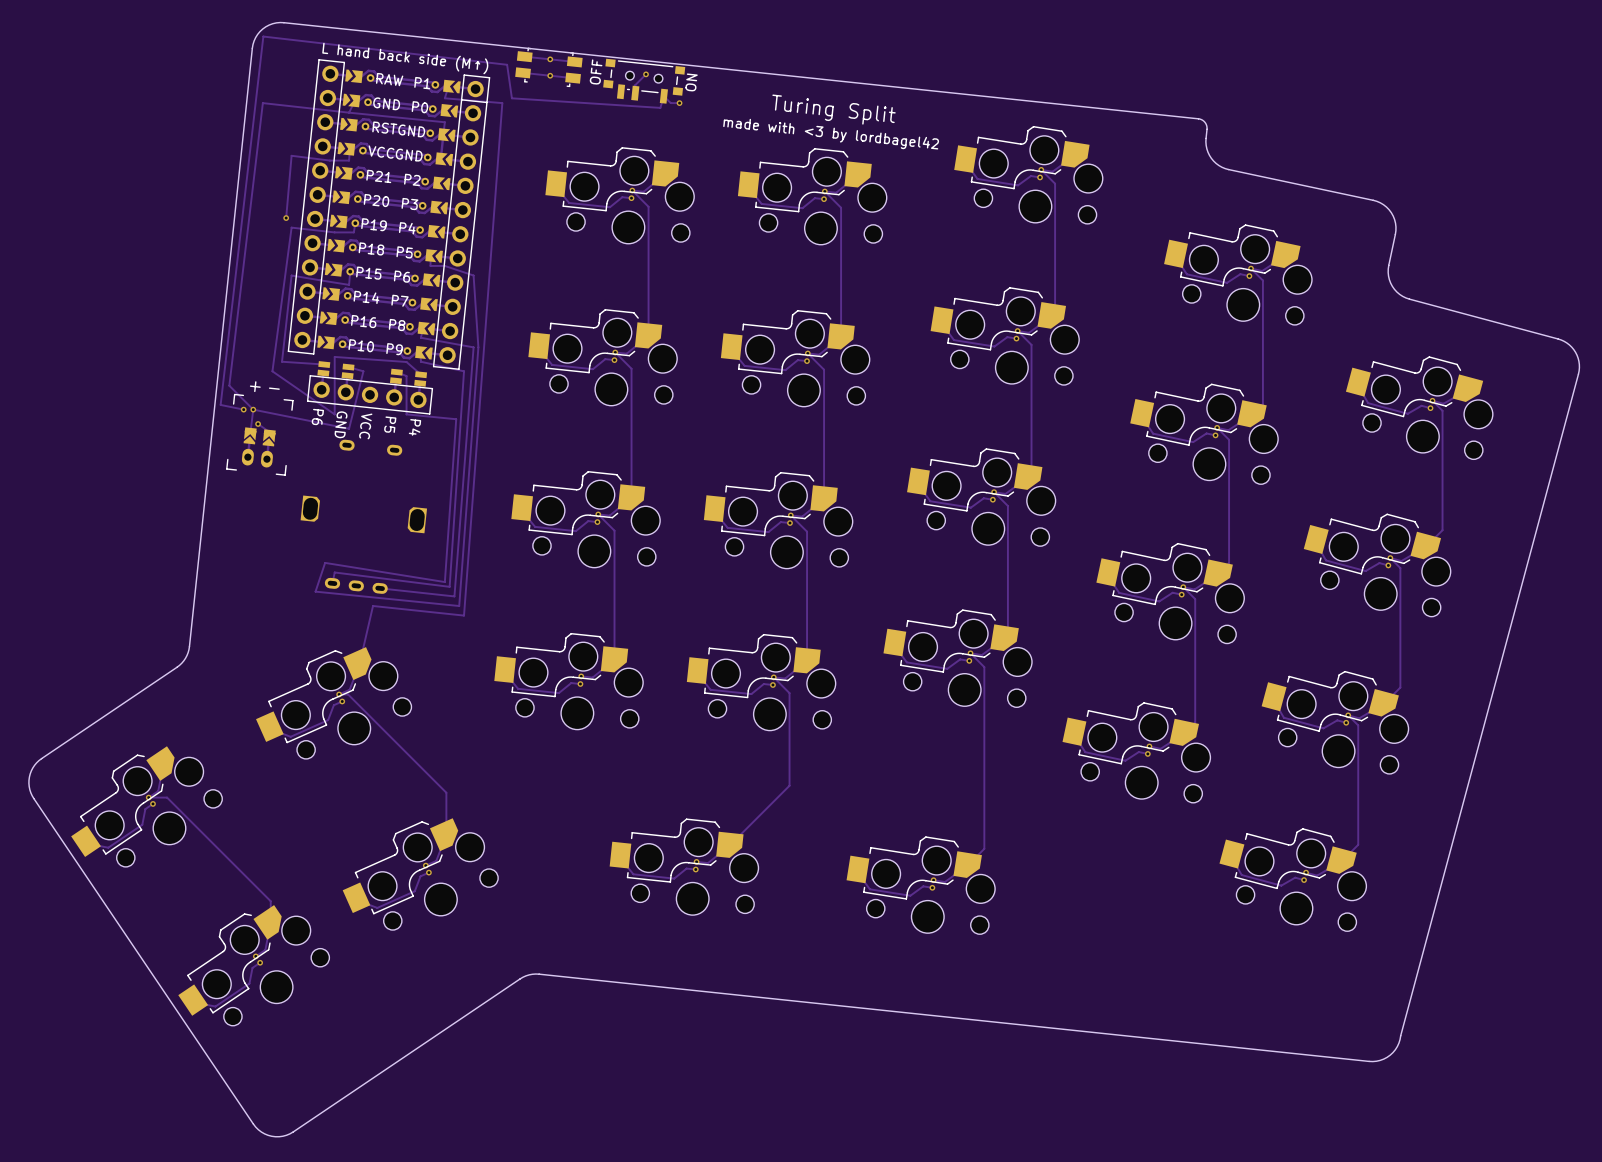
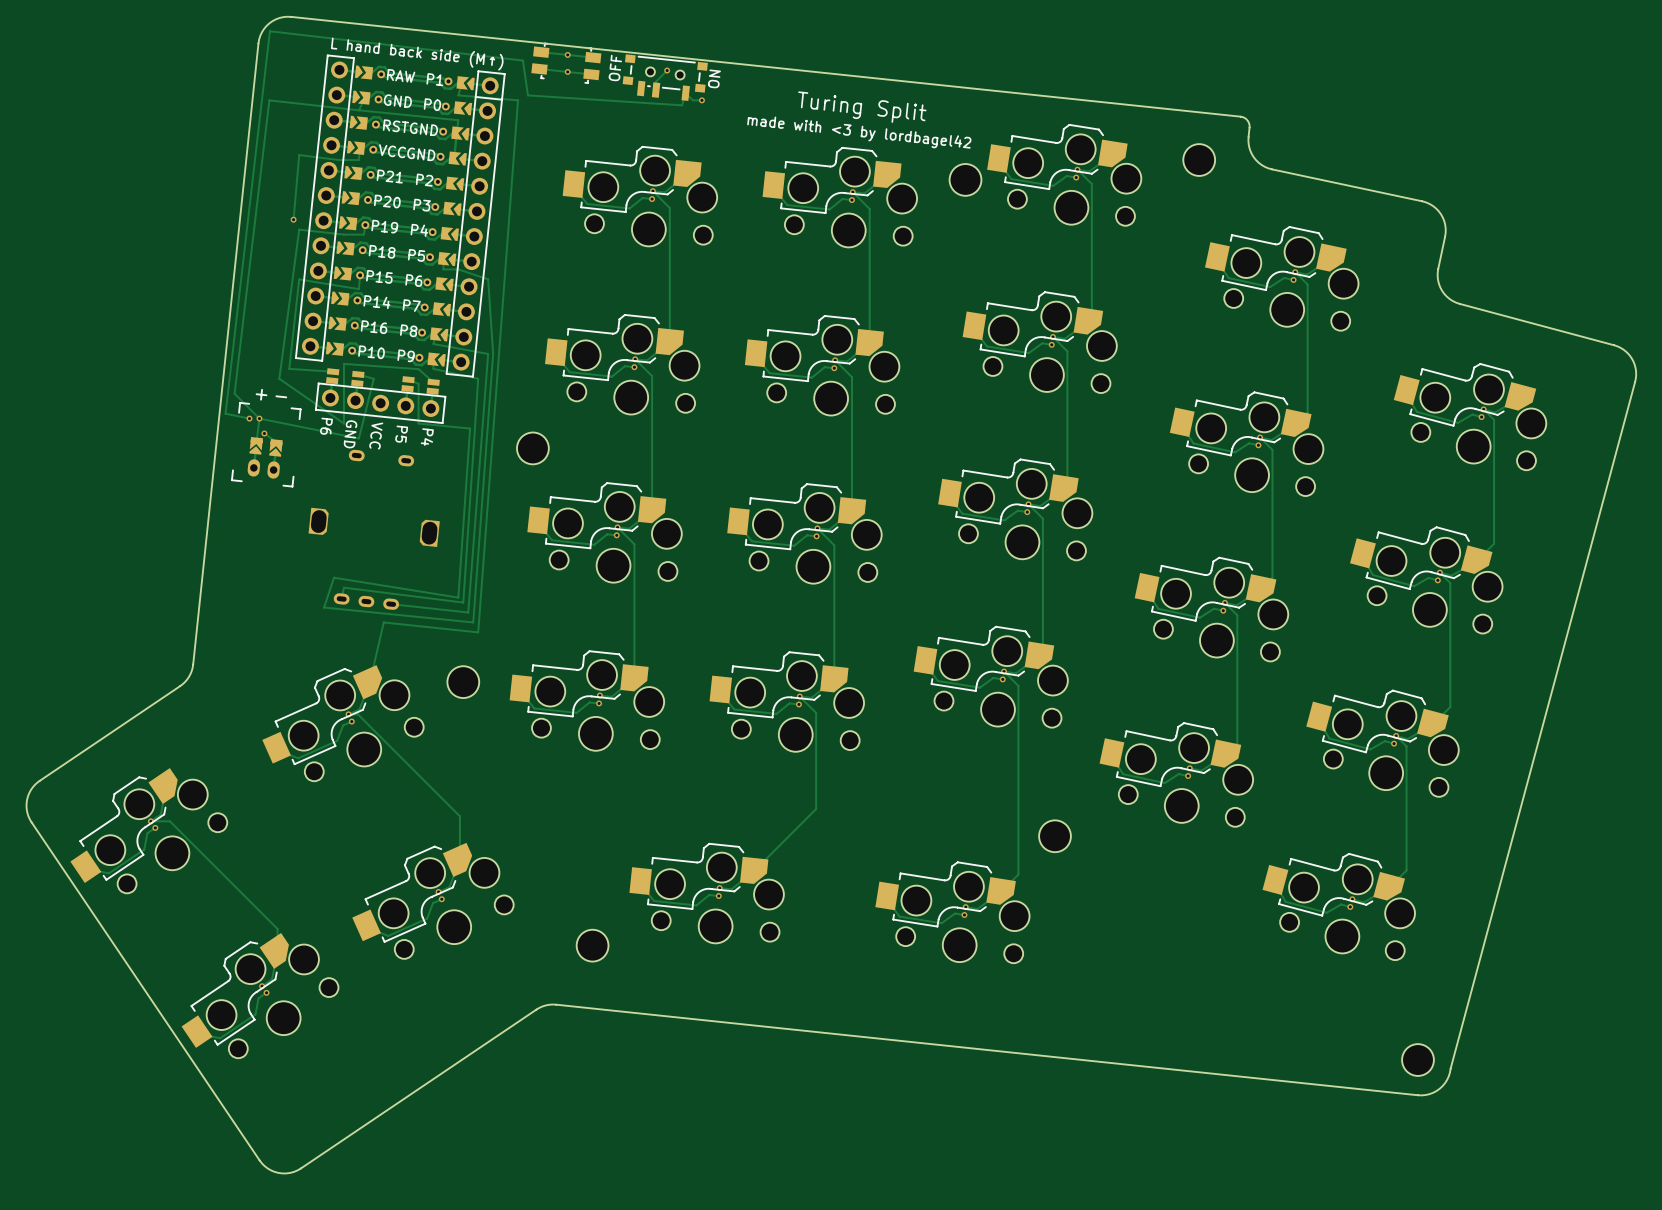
part: none -> (1199, 160)
part: none -> (965, 179)
part: none -> (532, 448)
part: none -> (463, 682)
part: none -> (1055, 836)
part: none -> (592, 945)
part: none -> (1417, 1060)

